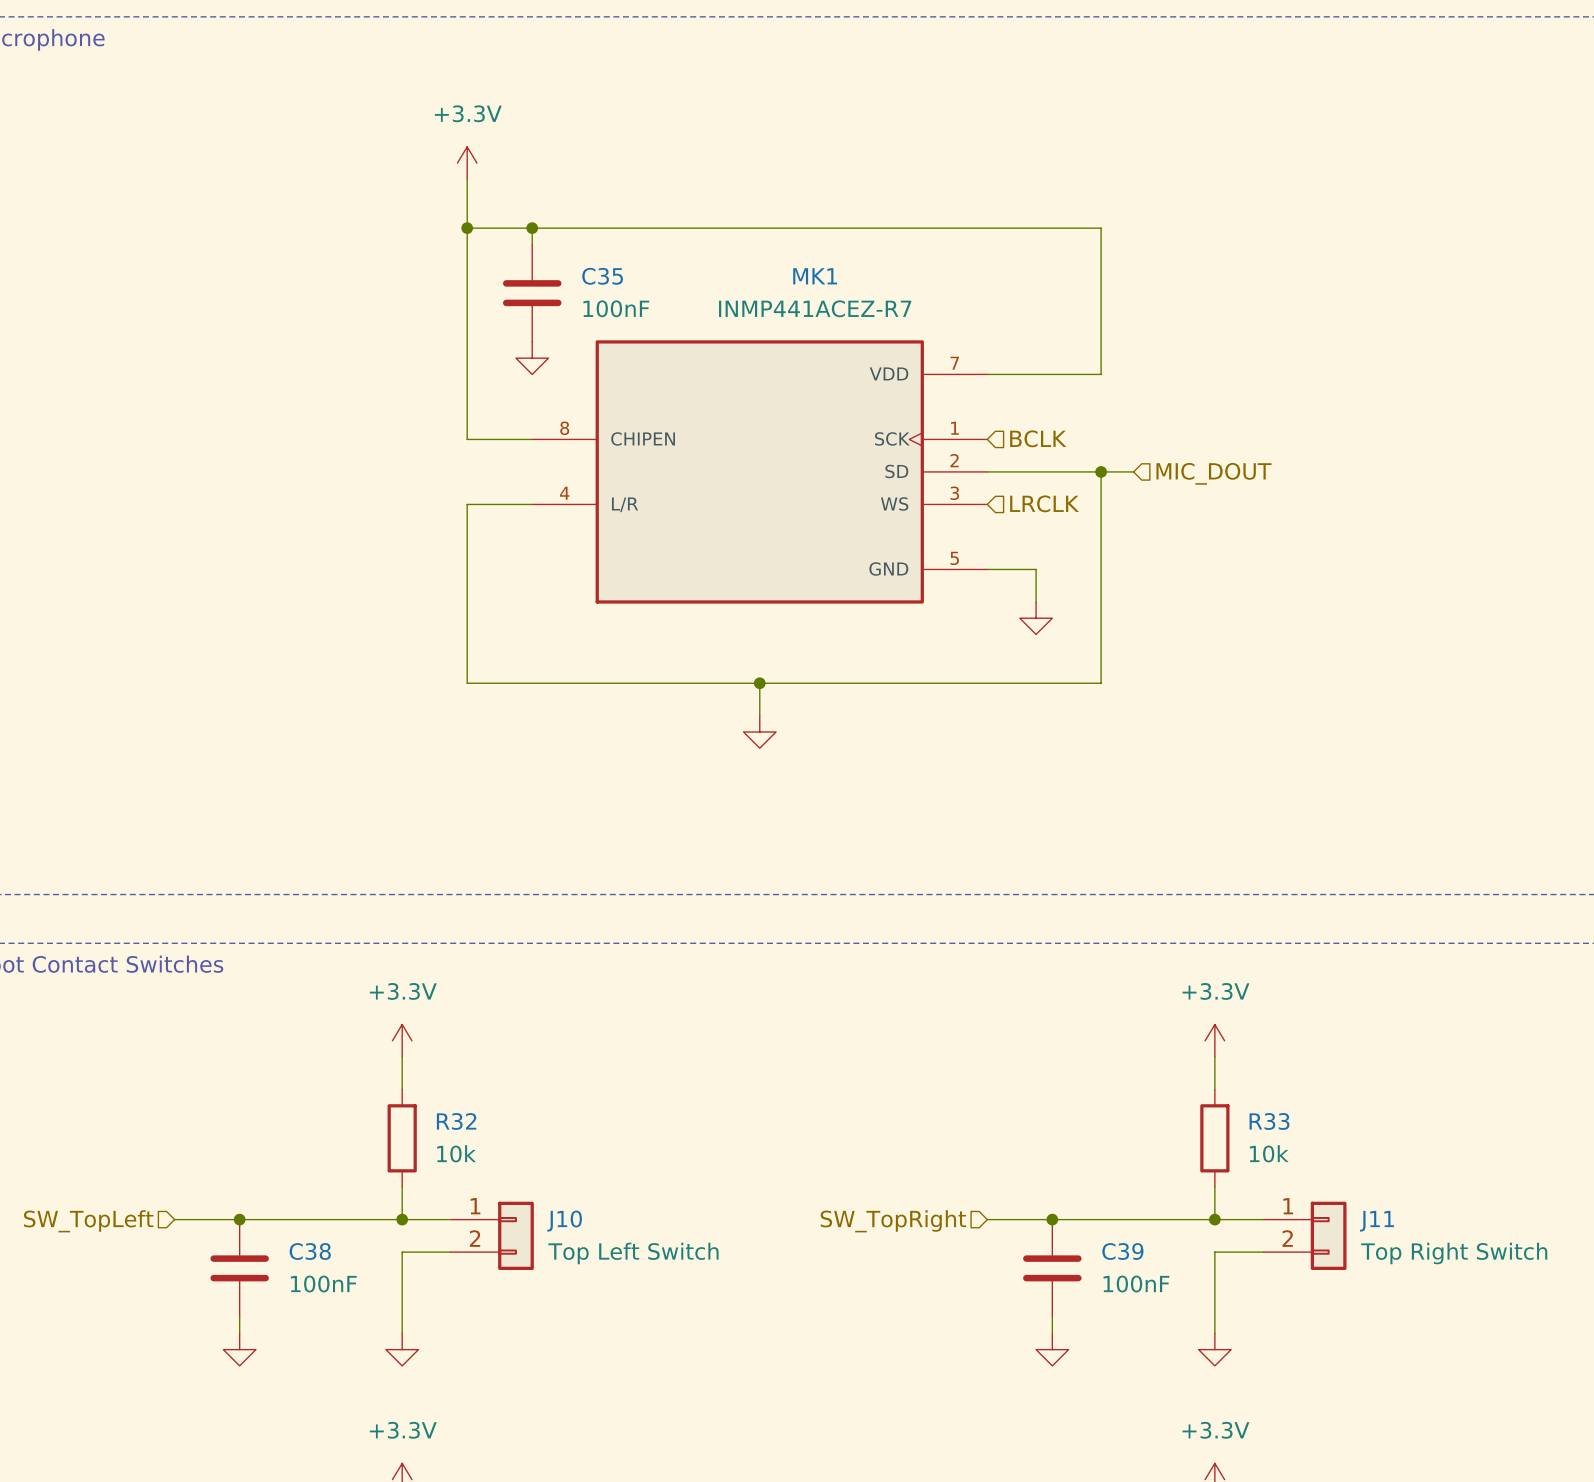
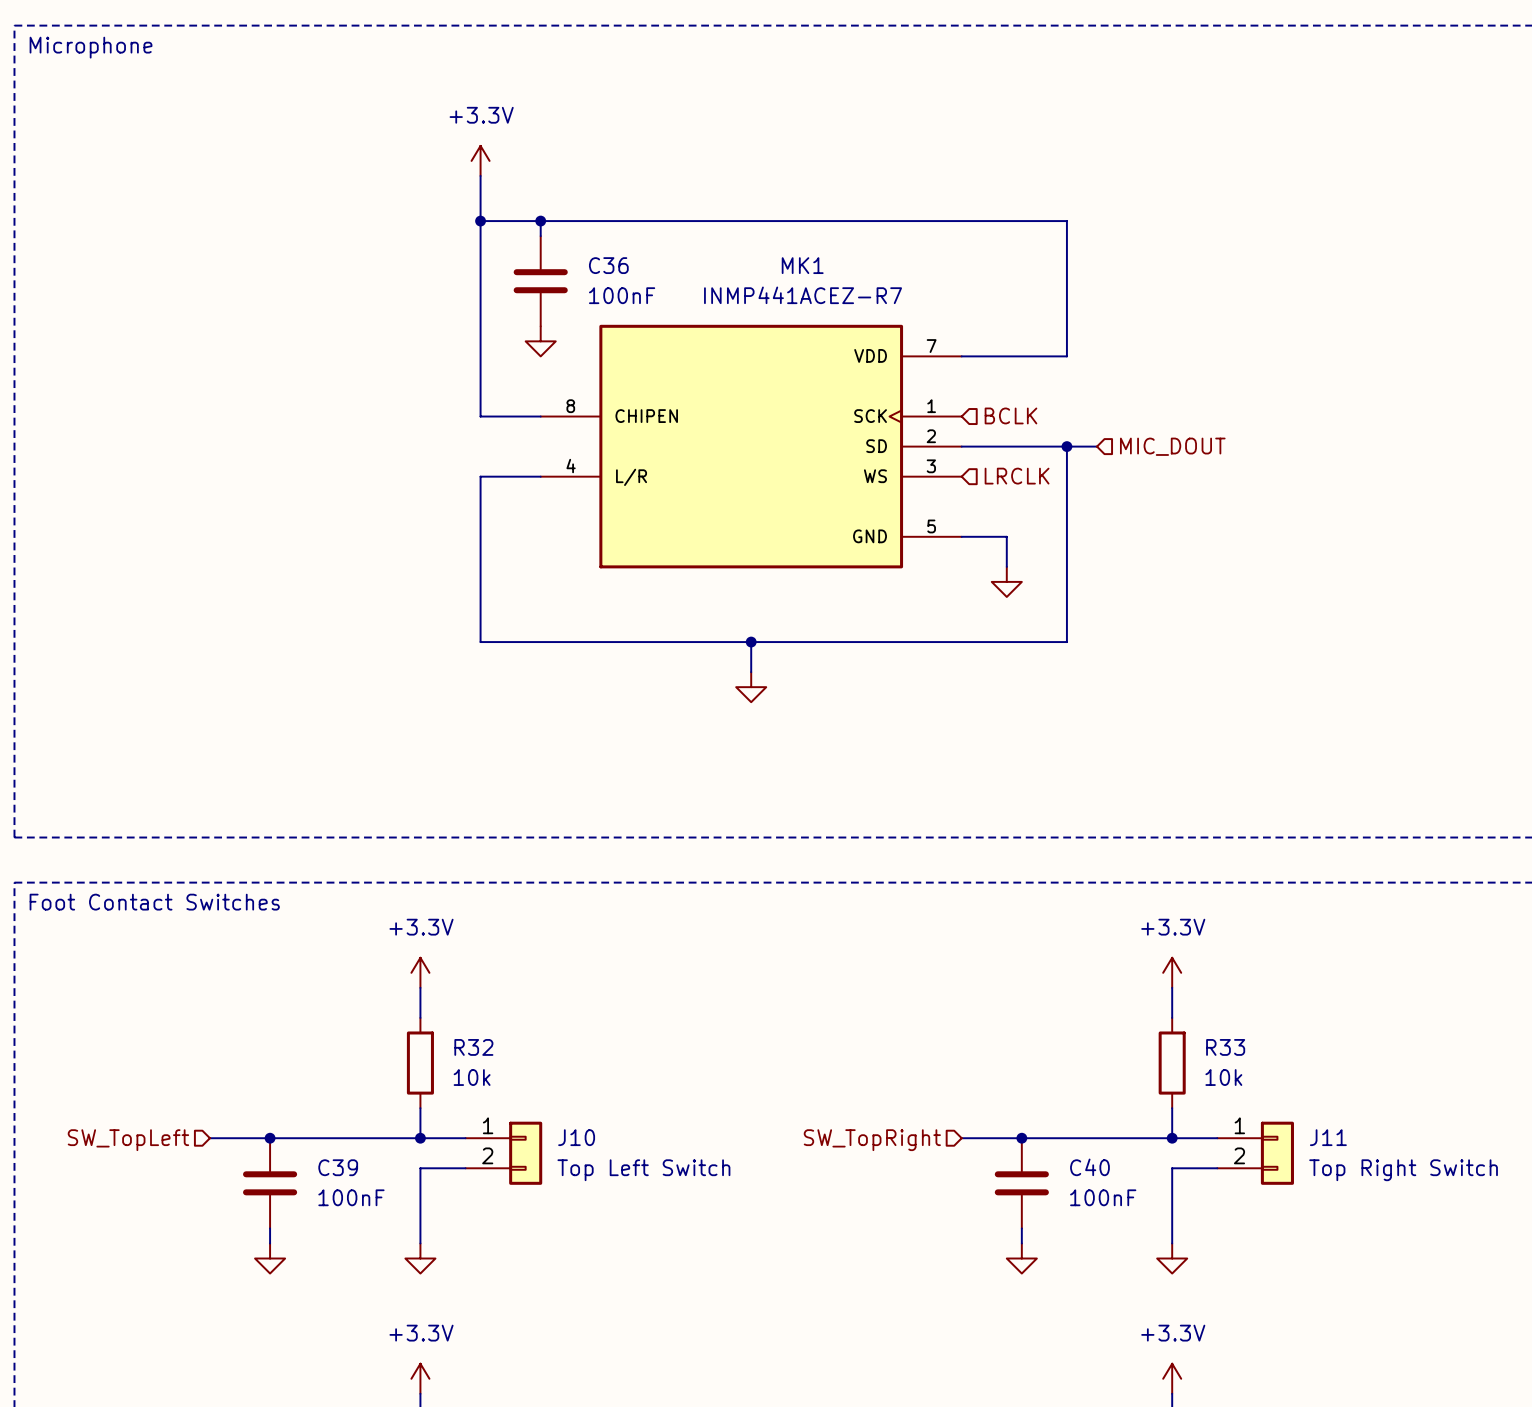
C35 name: C35 (602, 276) -> C36 (608, 265)
C38 name: C38 (310, 1251) -> C39 (338, 1167)
C39 name: C39 (1122, 1251) -> C40 (1089, 1167)

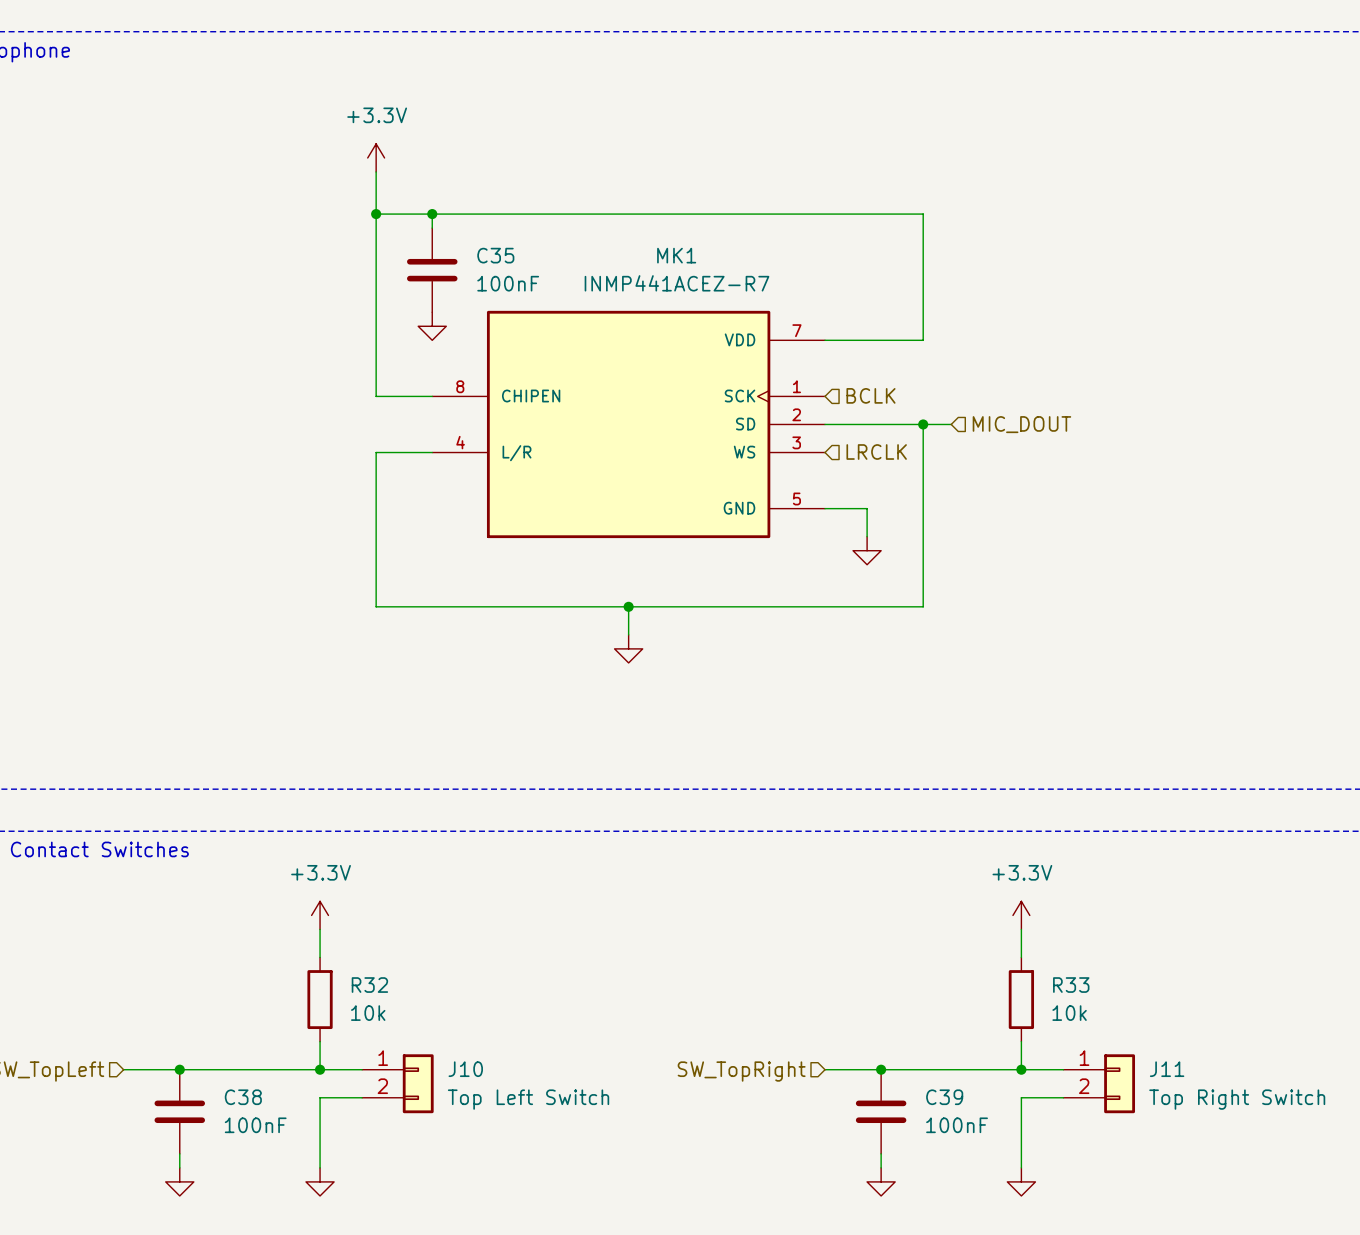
C36 name: C36 (608, 265) -> C35 (495, 255)
C39 name: C39 (338, 1167) -> C38 (243, 1097)
C40 name: C40 (1089, 1167) -> C39 (944, 1097)

